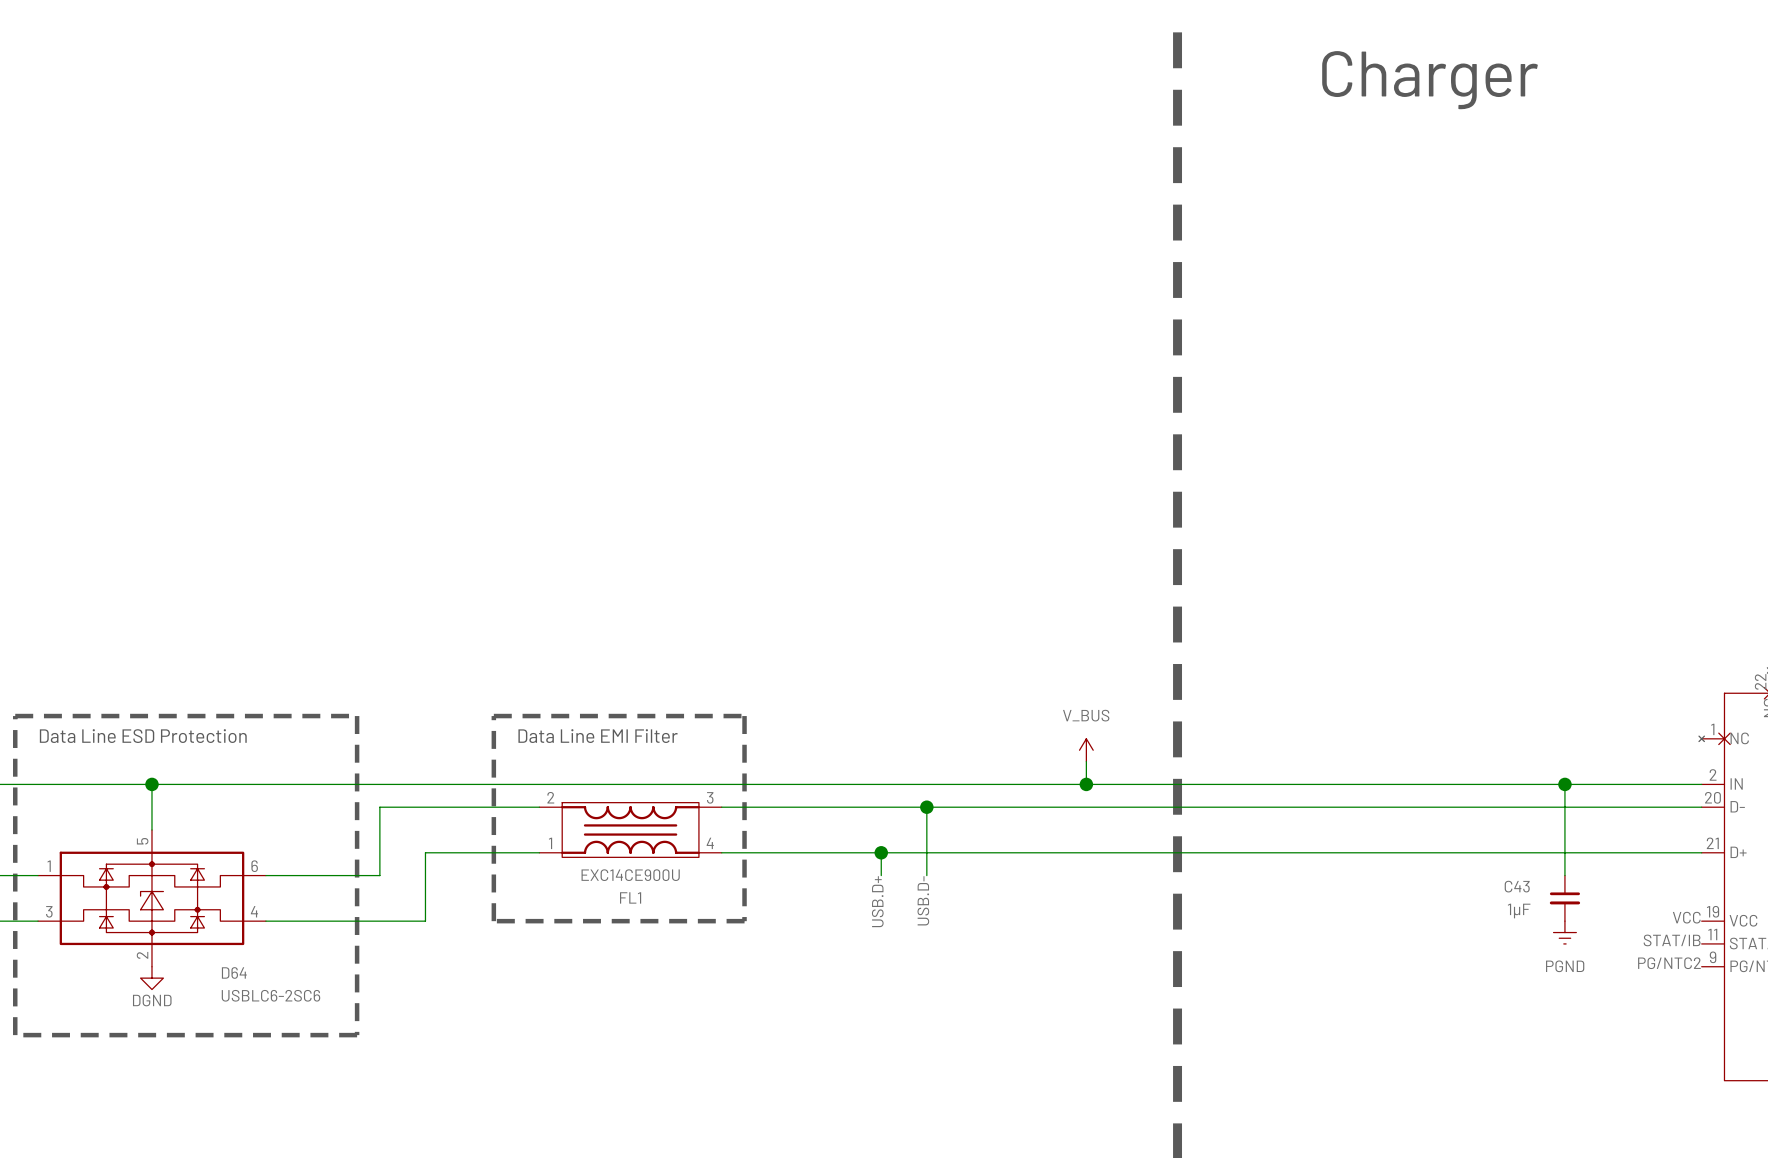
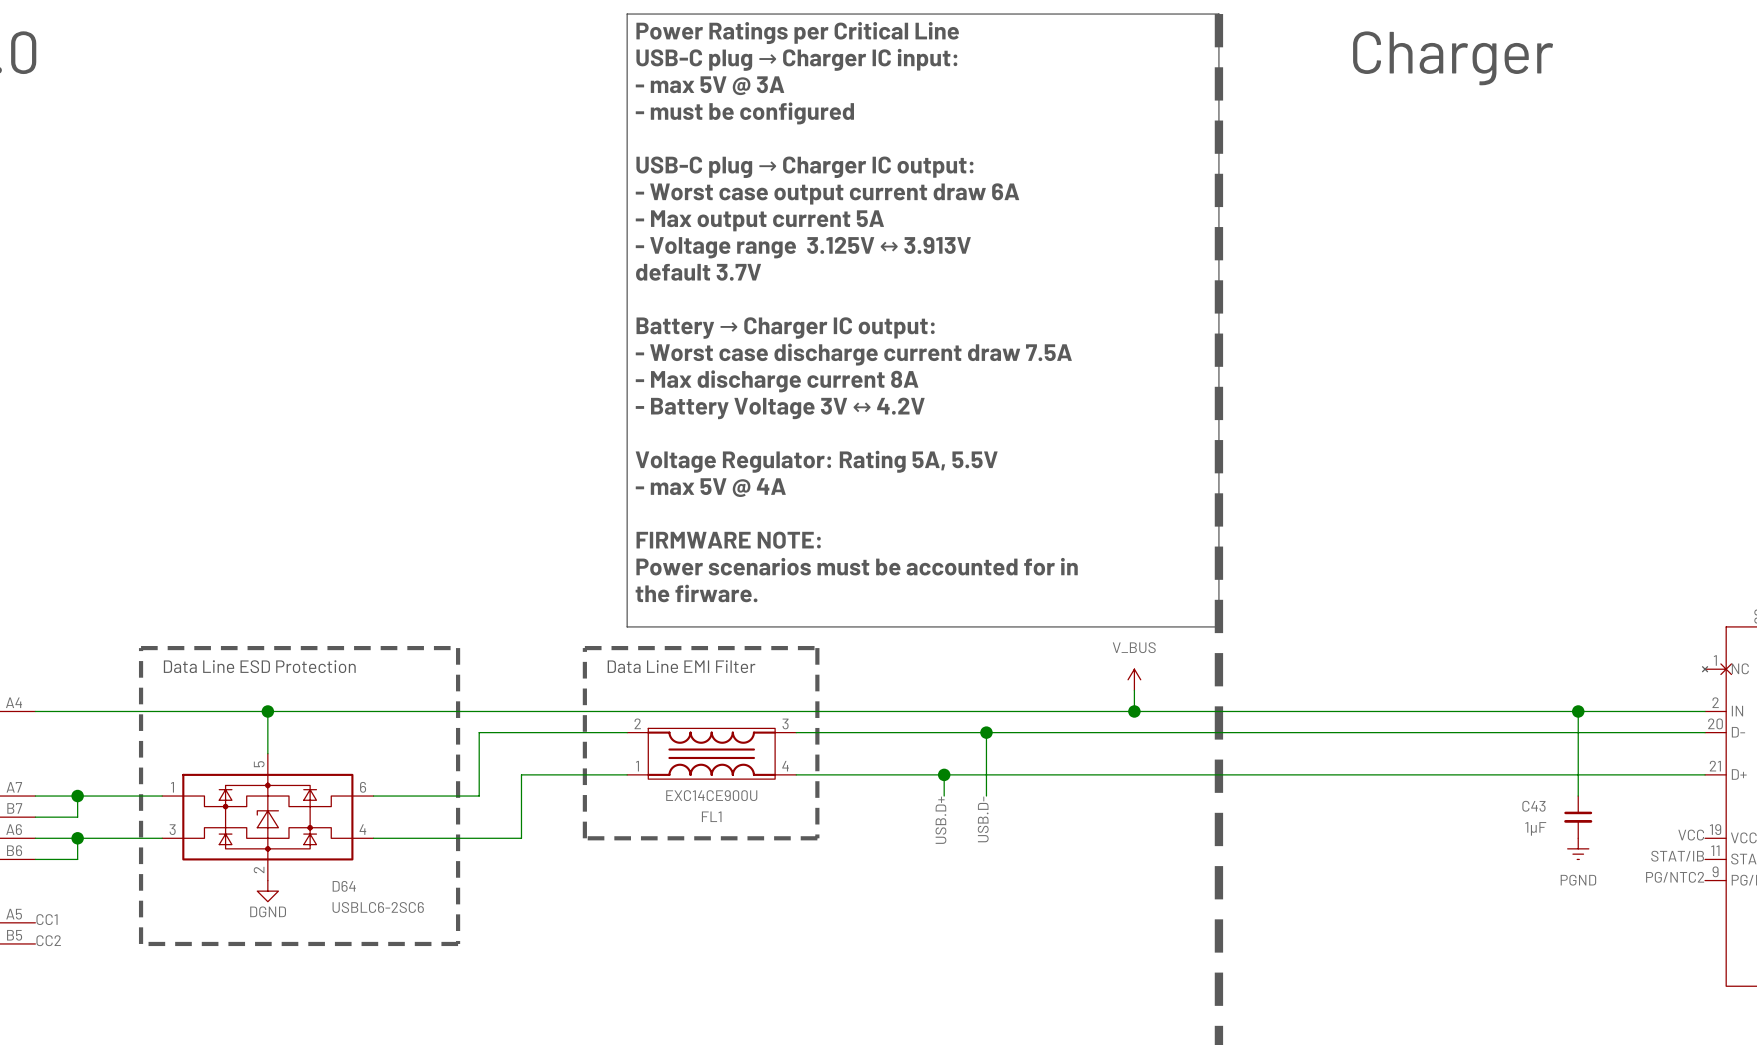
line: none -> (627, 14) (1218, 14) (1218, 626) (627, 626) (627, 14)
text: none -> Power Ratings per Critical Line (797, 33)
text: none -> USB-C plug → Charger IC input: (796, 59)
text: none -> - max 5V @ 3A (710, 85)
text: none -> - must be configured (744, 113)
text: none -> USB-C plug → Charger IC output: (804, 167)
text: none -> - Worst case output current draw 6A (827, 193)
text: none -> - Max output current 5A (759, 220)
text: none -> - Voltage range 3.125V ↔ 3.913V (803, 247)
text: none -> default 3.7V (698, 272)
text: none -> Battery → Charger IC output: (785, 328)
text: none -> - Worst case discharge current draw 7.5A (853, 354)
text: none -> - Max discharge current 8A (777, 381)
text: none -> - Battery Voltage 3V ↔ 4.2V (780, 408)
text: none -> Voltage Regulator: Rating 5A, 5.5V (816, 461)
text: none -> - max 5V @ 4A (710, 487)
text: none -> FIRMWARE NOTE: (728, 540)
text: none -> Power scenarios must be accounted for in (857, 566)
text: none -> the firware. (696, 593)

